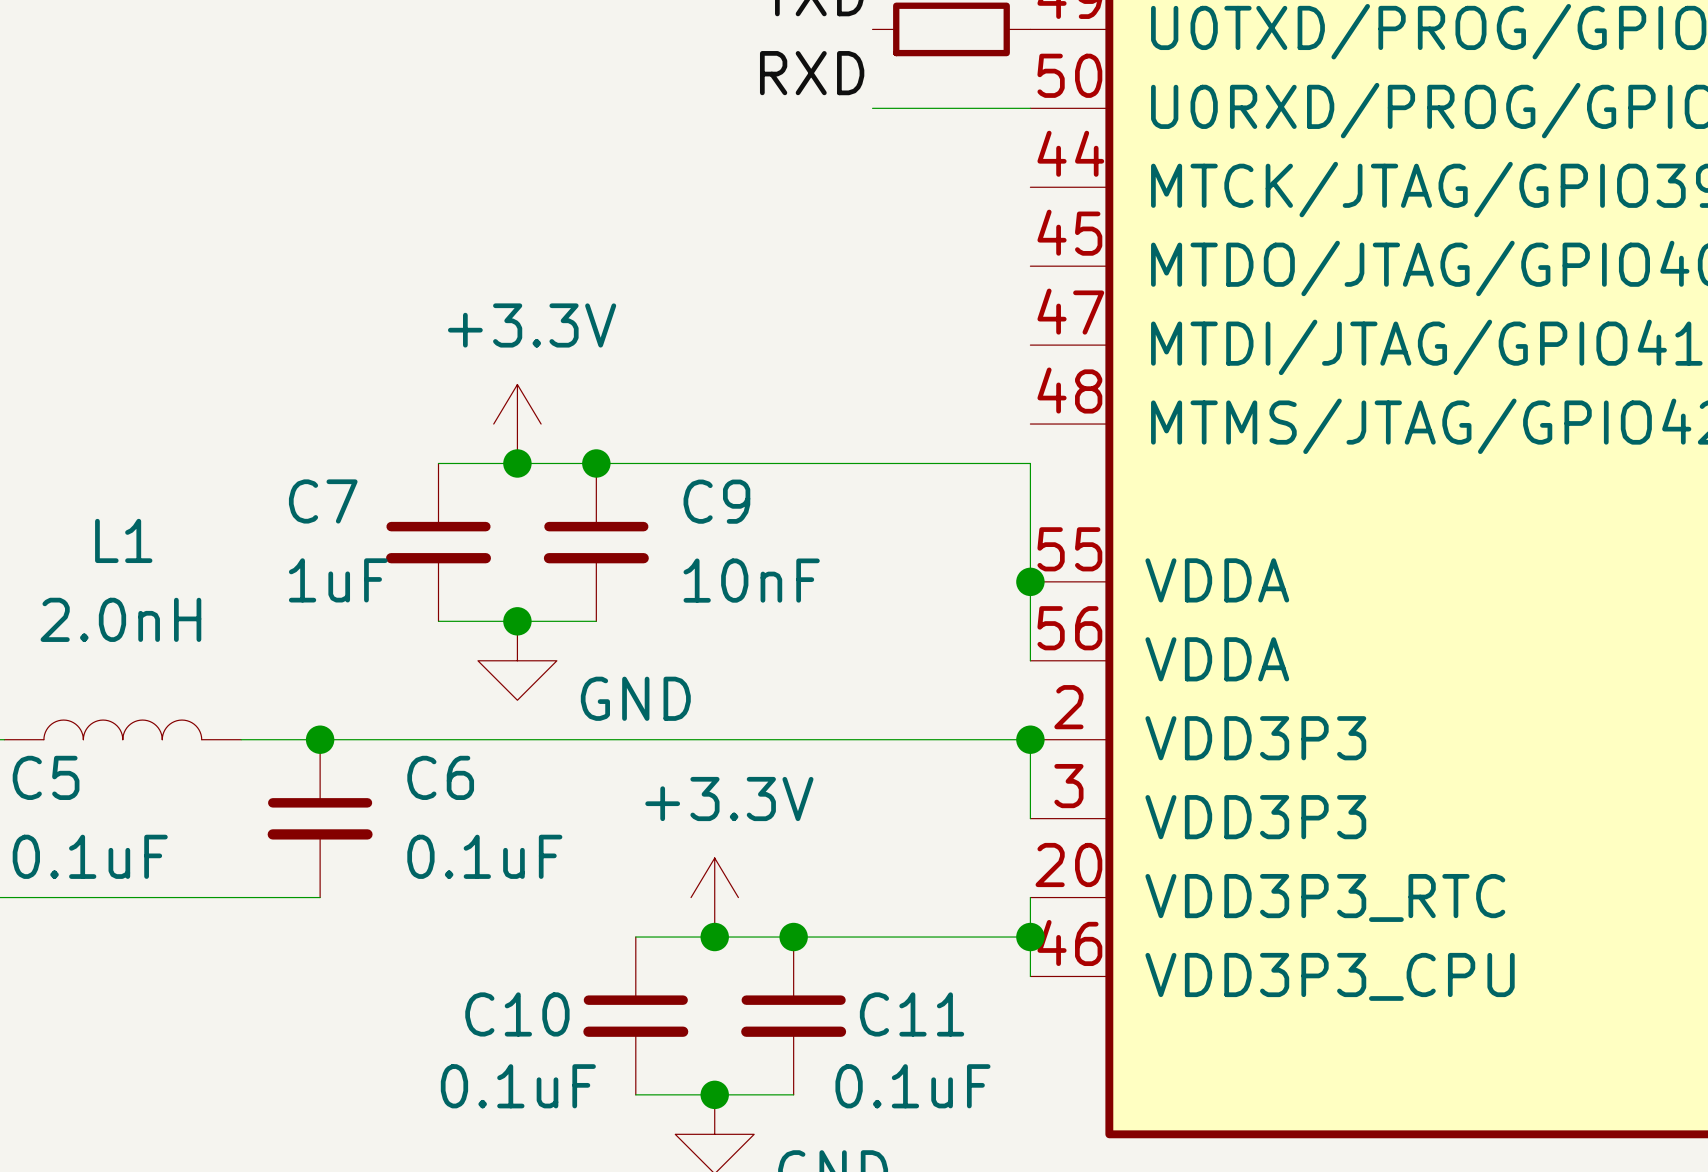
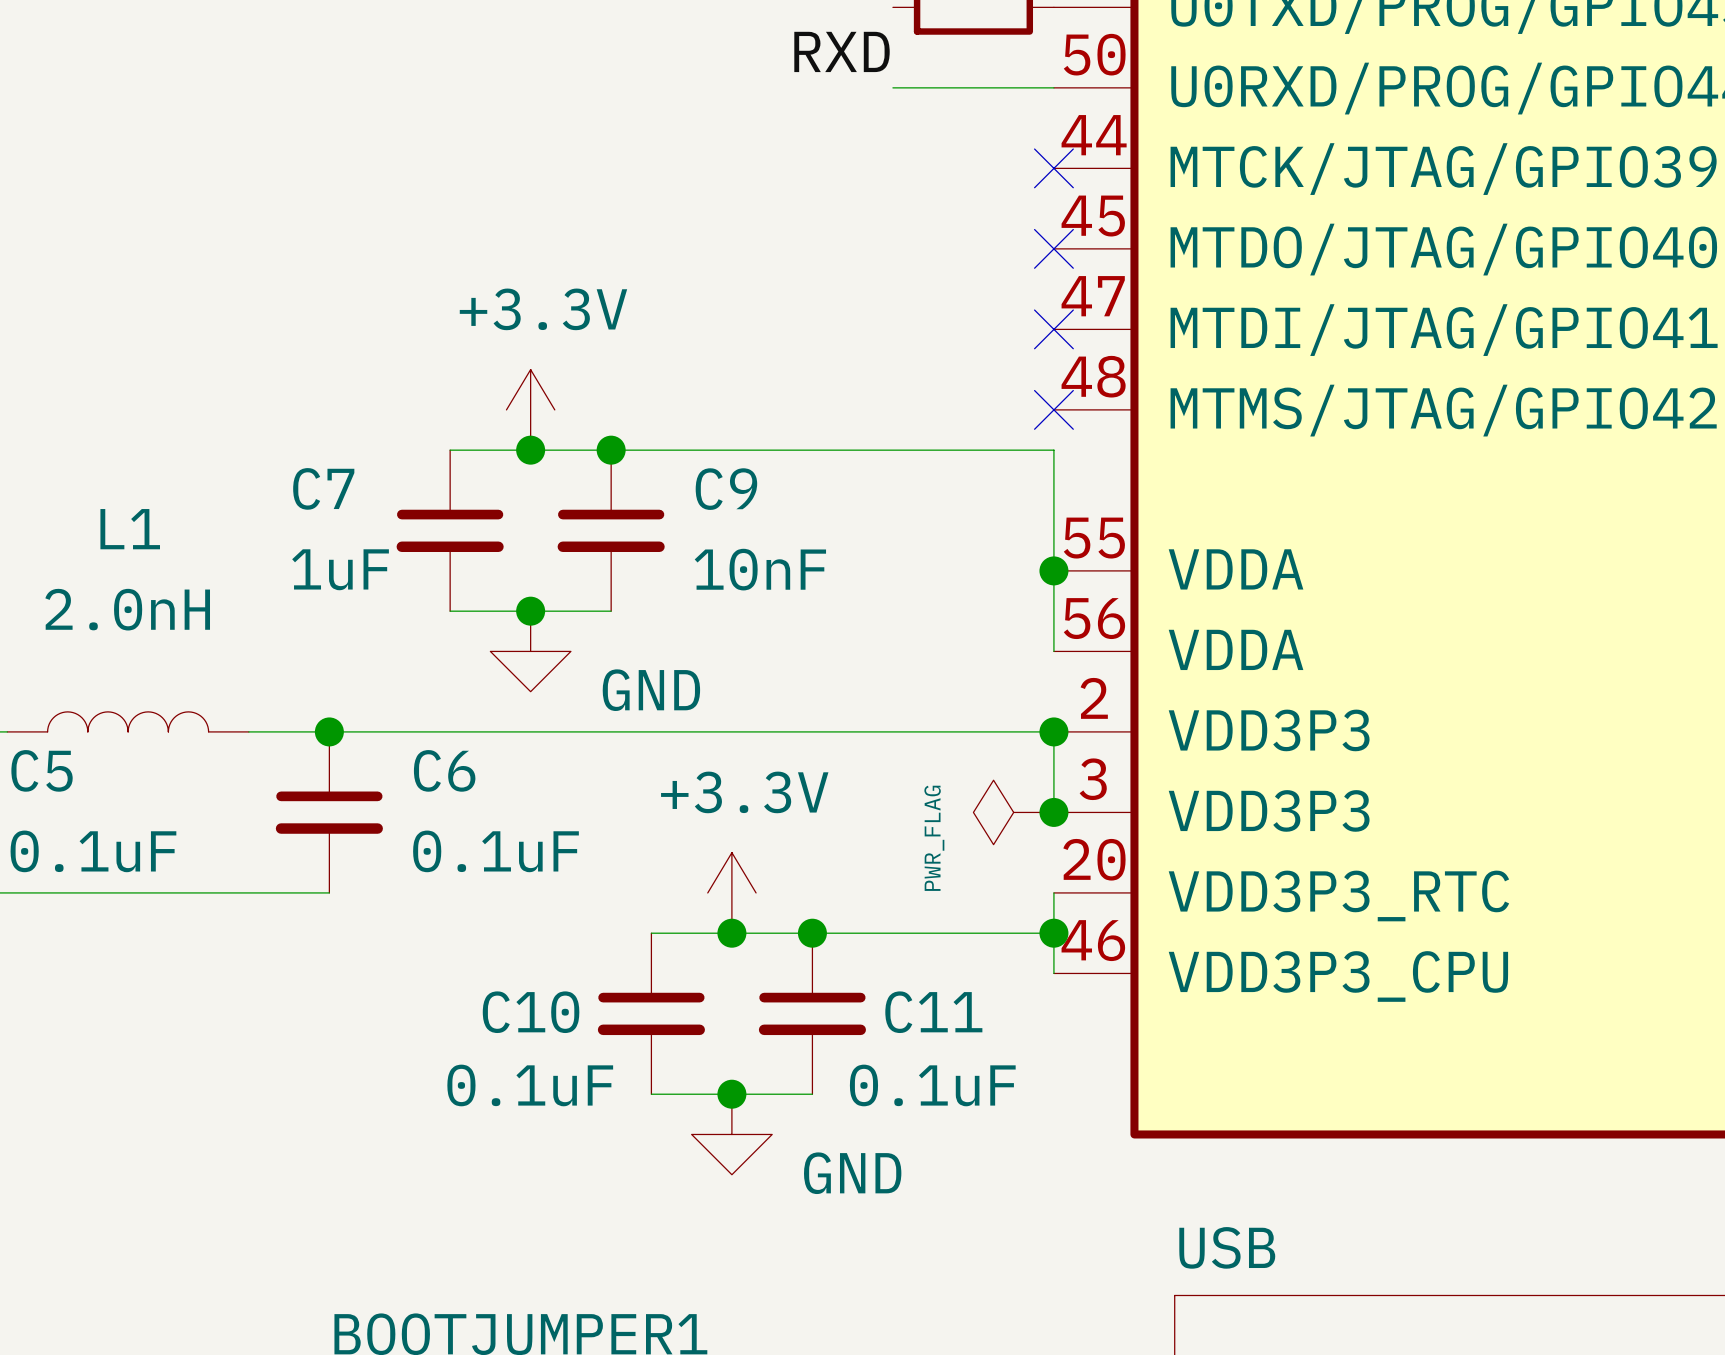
no-connect mark: none -> (1053, 168)
no-connect mark: none -> (1053, 248)
no-connect mark: none -> (1053, 329)
no-connect mark: none -> (1053, 409)
power symbol: none -> PWR_FLAG (1013, 812)
junction: none -> (1053, 812)

